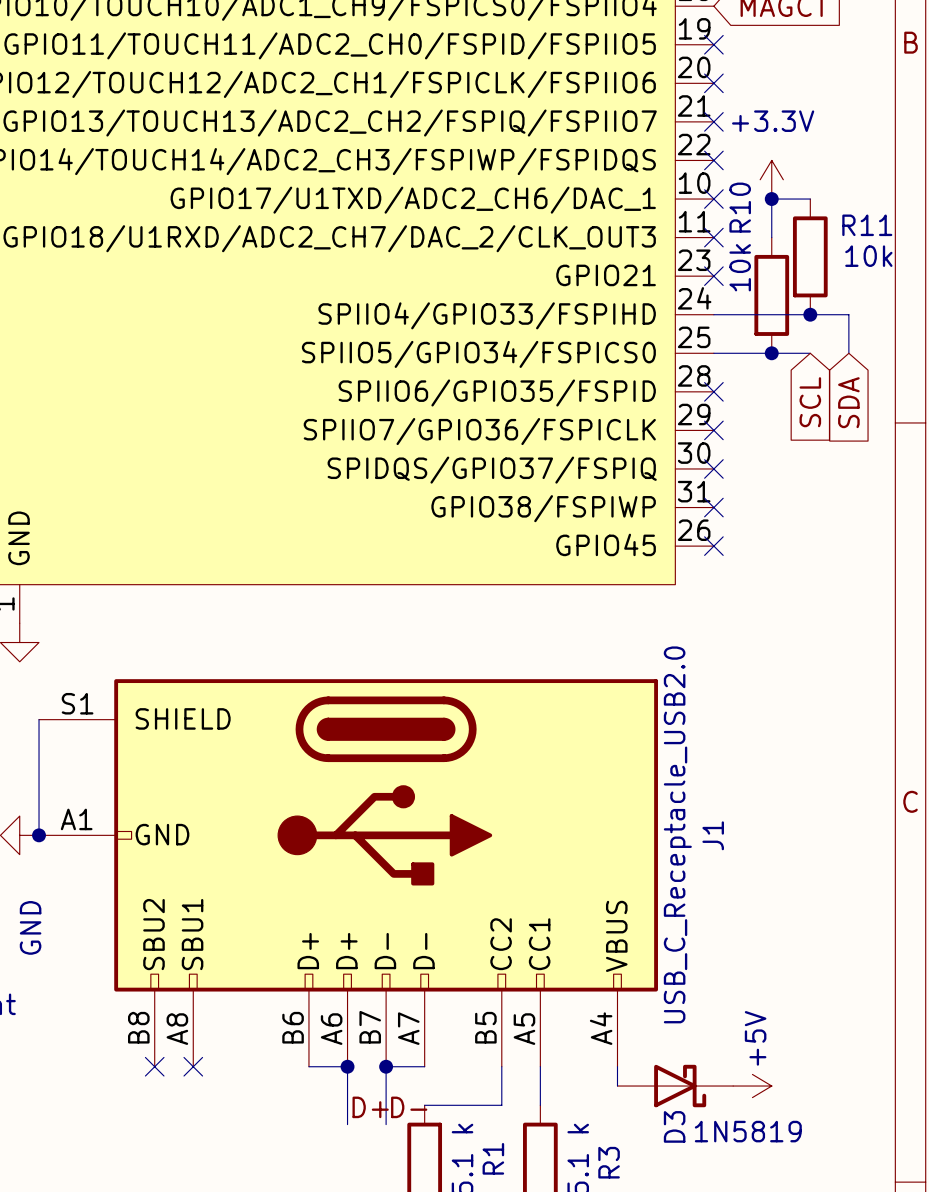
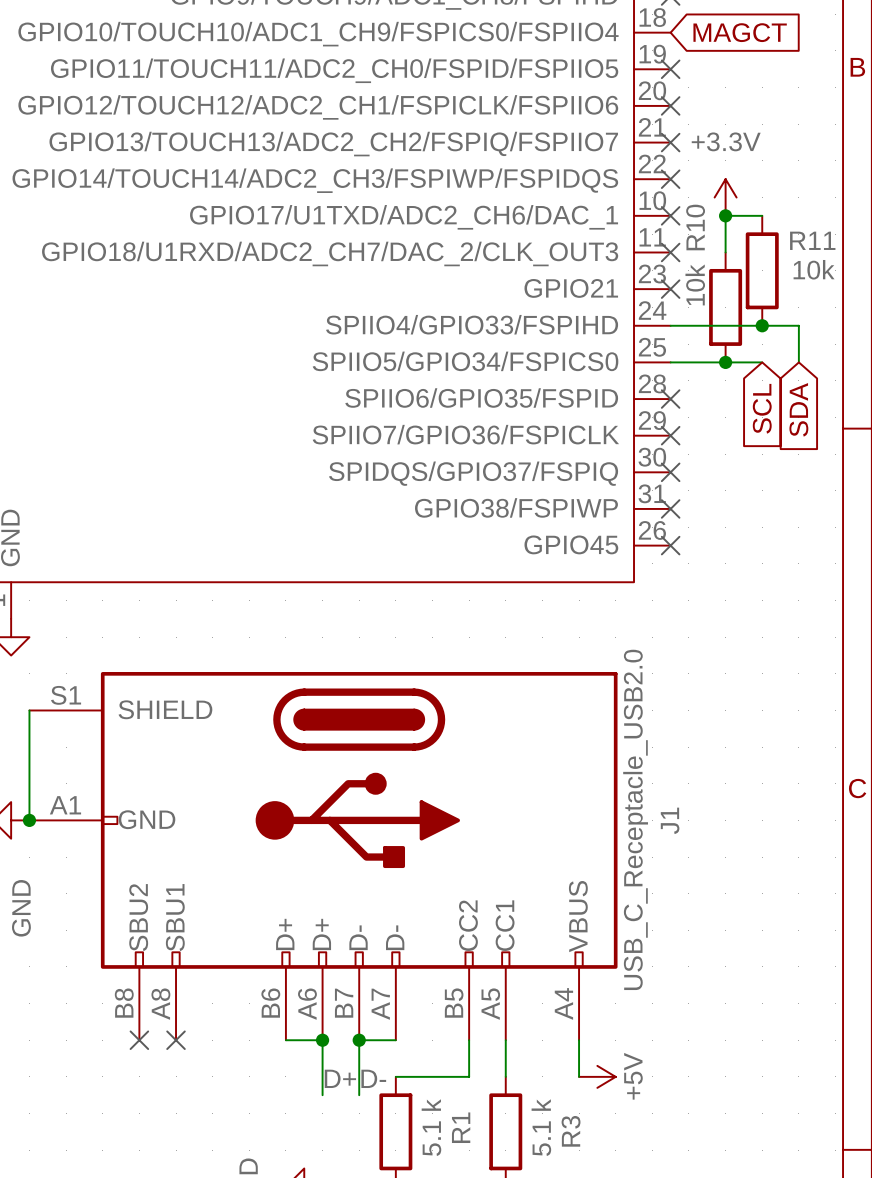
power symbol text position: +5V (755, 1038) -> +5V (633, 1076)
wire: none -> (579, 1058) (579, 1076)
D3: 1N5819 (675, 1086) -> none
power symbol position: +5V (752, 1086) -> +5V (597, 1076)

